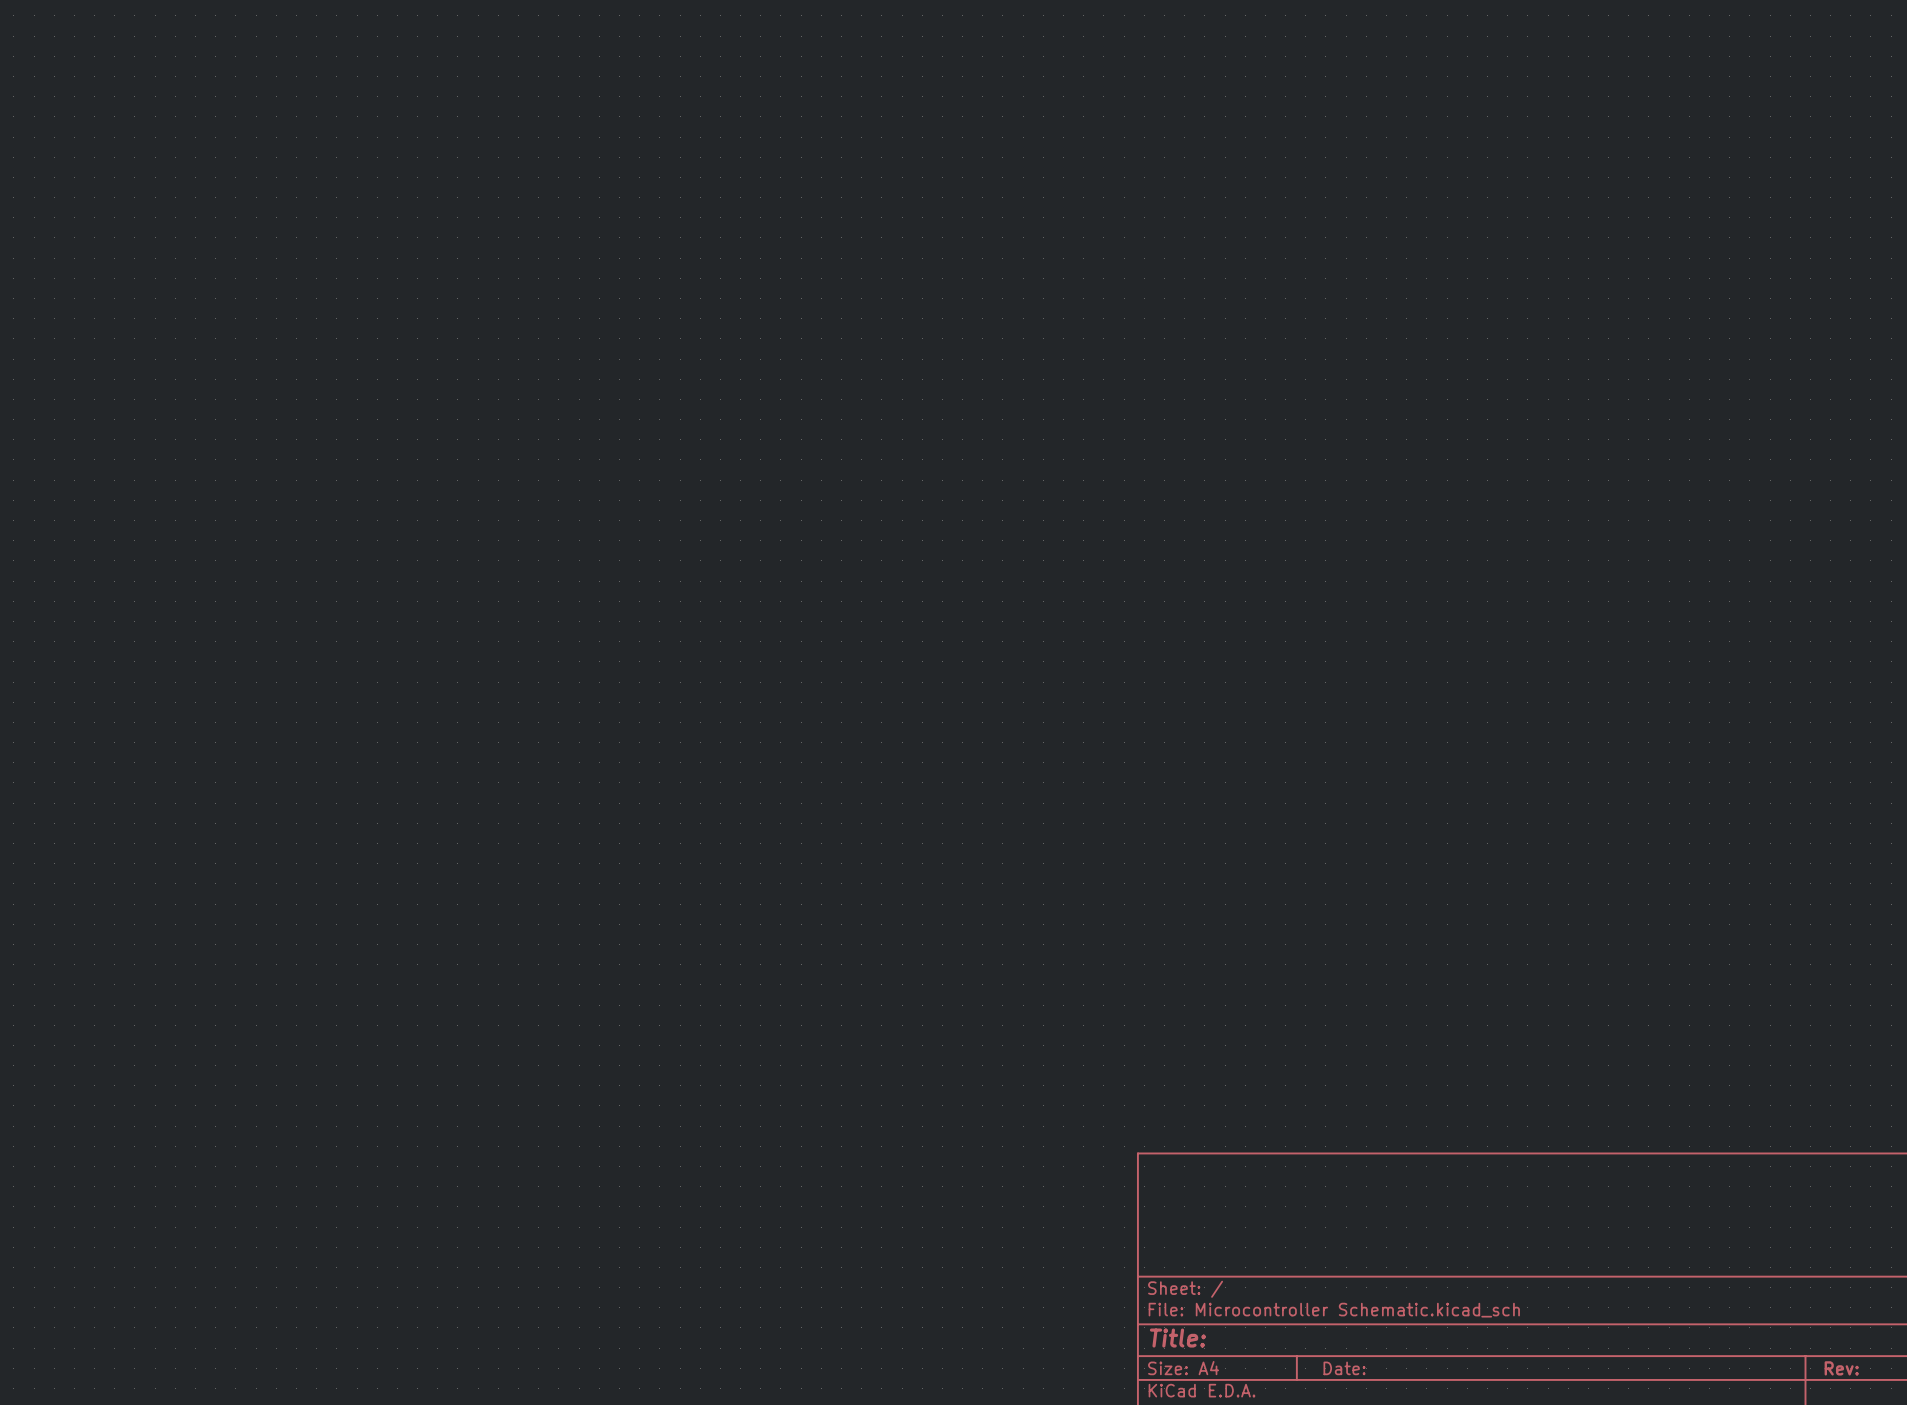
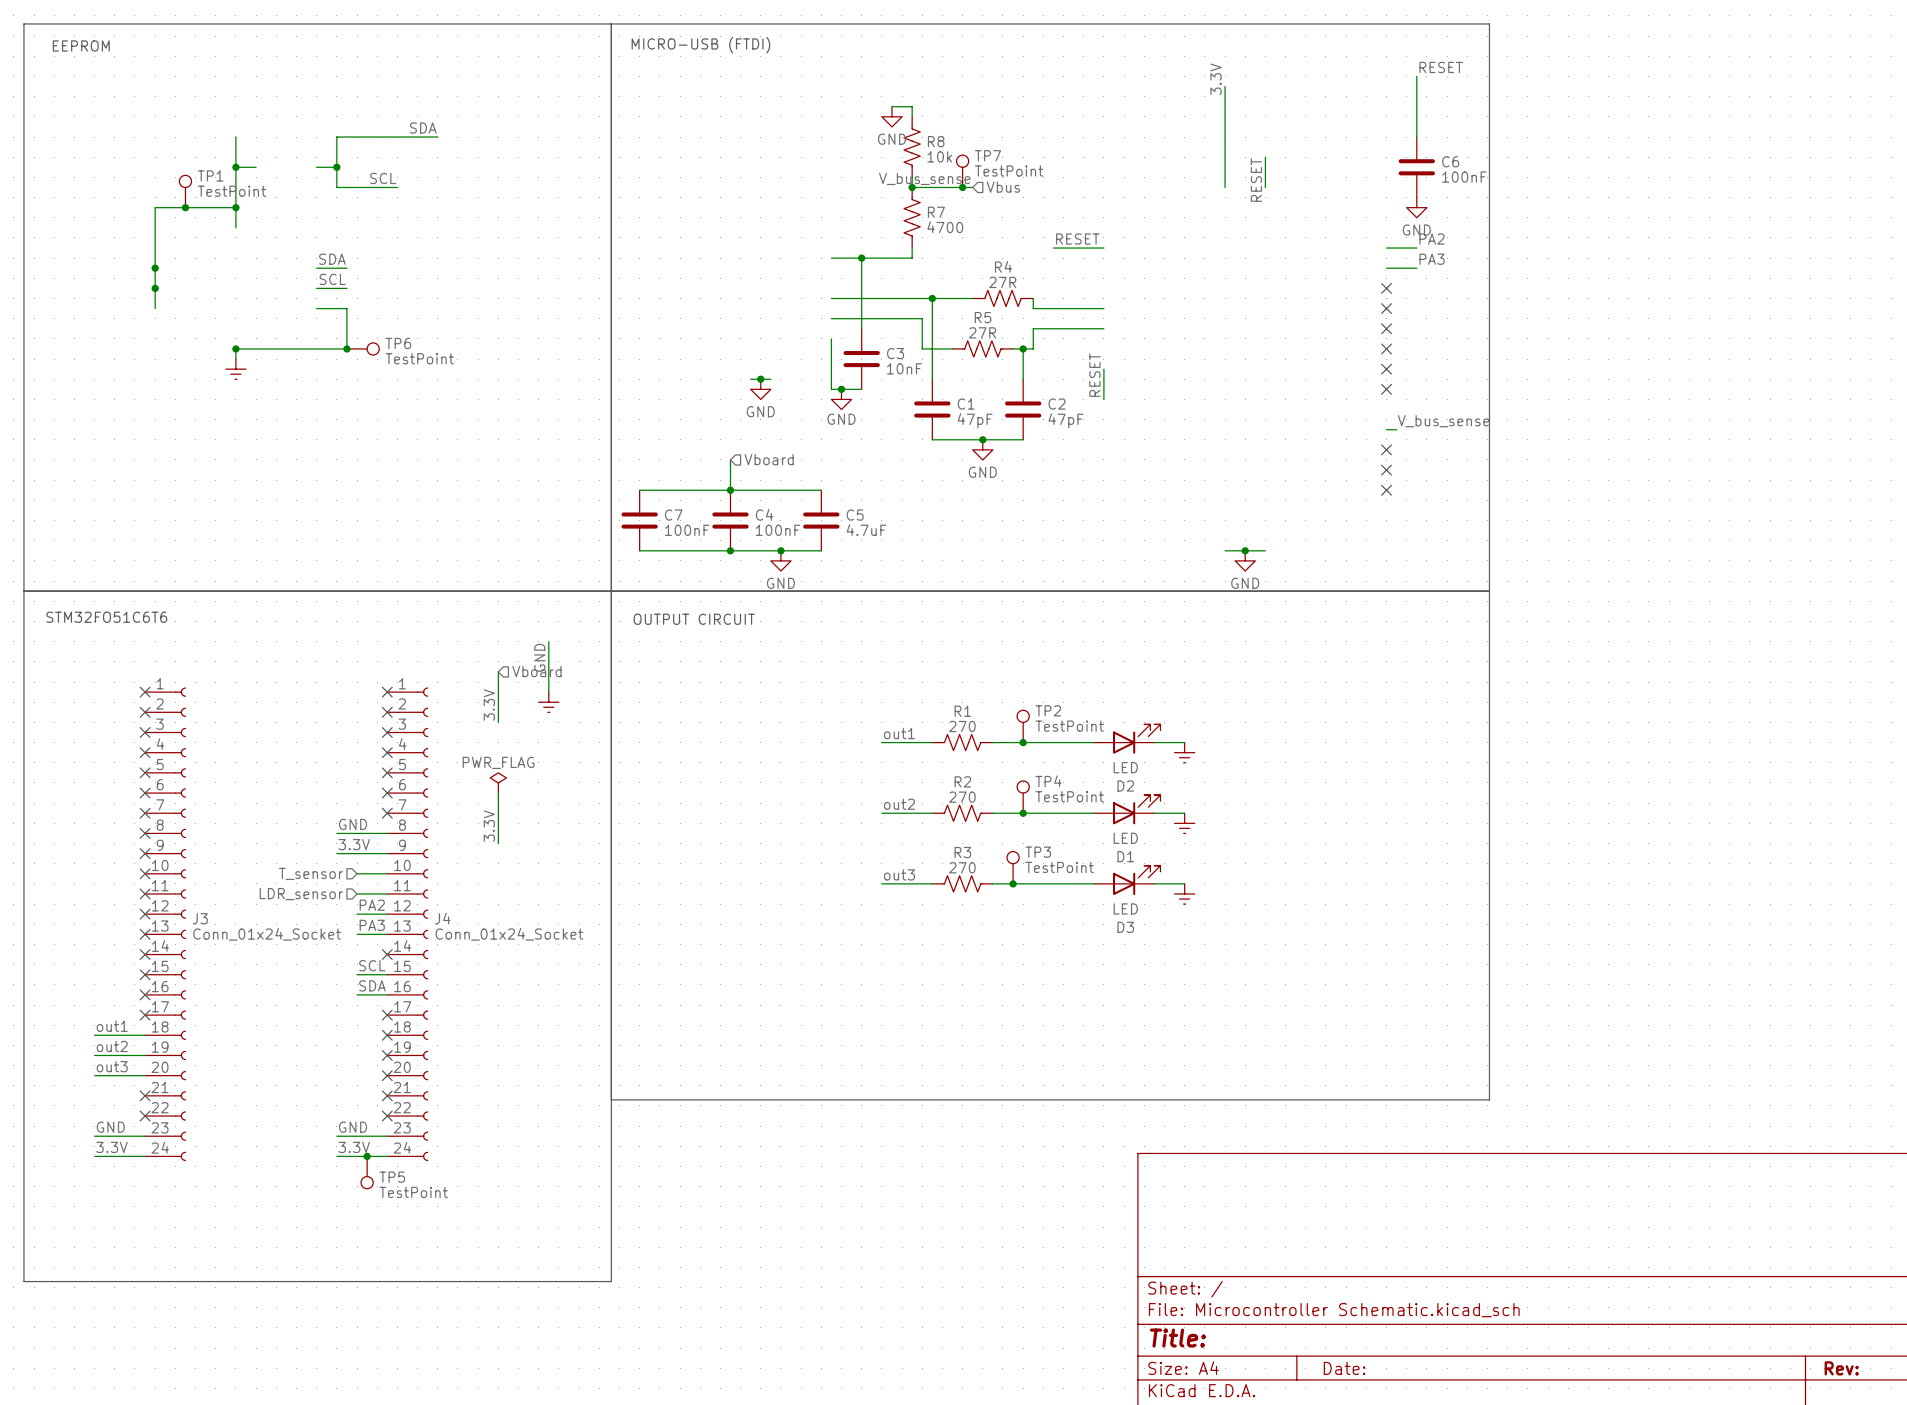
line: none -> (611, 23) (611, 1281) (23, 1281) (23, 23) (1489, 23) (1489, 1099) (611, 1099)
text: none -> EEPROM (81, 45)
text: none -> MICRO-USB (FTDI) (700, 45)
label: none -> RESET (1441, 67)
wire: none -> (1416, 76) (1416, 137)
label: none -> 3.3V (1216, 79)
wire: none -> (1225, 86) (1225, 187)
wire: none -> (891, 106) (912, 106) (912, 116)
power symbol: none -> GND (891, 116)
label: none -> SDA (423, 128)
wire: none -> (235, 137) (235, 227)
wire: none -> (437, 137) (336, 137) (336, 187) (397, 187)
R8: none -> 10k (912, 147)
wire: none -> (1265, 157) (1265, 187)
wire: none -> (235, 167) (256, 167)
junction: none -> (235, 167)
wire: none -> (316, 167) (336, 167)
junction: none -> (336, 167)
C6: none -> 100nF (1416, 167)
TP7: none -> TestPoint (962, 171)
wire: none -> (912, 177) (912, 187) (972, 187)
label: none -> SCL (383, 178)
label: none -> V_bus_sense (924, 178)
label: none -> RESET (1256, 180)
junction: none -> (912, 187)
junction: none -> (962, 187)
hierarchical label: none -> Vbus (1003, 187)
TP1: none -> TestPoint (185, 191)
junction: none -> (185, 207)
wire: none -> (235, 207) (155, 207) (155, 308)
junction: none -> (235, 207)
power symbol: none -> GND (1416, 207)
R7: none -> 4700 (912, 217)
label: none -> RESET (1077, 239)
label: none -> PA2 (1432, 239)
wire: none -> (912, 248) (912, 258) (831, 258)
wire: none -> (1053, 248) (1103, 248)
wire: none -> (1386, 248) (1416, 248)
wire: none -> (861, 258) (861, 328)
junction: none -> (861, 258)
label: none -> SDA (332, 259)
label: none -> PA3 (1432, 259)
junction: none -> (155, 268)
wire: none -> (316, 268) (346, 268)
wire: none -> (1386, 268) (1416, 268)
label: none -> SCL (332, 279)
junction: none -> (155, 288)
wire: none -> (316, 288) (346, 288)
no-connect mark: none -> (1386, 288)
wire: none -> (831, 298) (972, 298)
wire: none -> (932, 298) (932, 379)
junction: none -> (932, 298)
R4: none -> 27R (1002, 298)
wire: none -> (1033, 298) (1033, 308) (1103, 308)
wire: none -> (316, 308) (346, 308) (346, 348) (235, 348) (235, 359)
no-connect mark: none -> (1386, 308)
wire: none -> (831, 318) (922, 318) (922, 348) (952, 348)
wire: none -> (1103, 328) (1033, 328) (1033, 348) (1013, 348)
no-connect mark: none -> (1386, 328)
wire: none -> (831, 338) (831, 389) (861, 389)
junction: none -> (235, 348)
junction: none -> (346, 348)
TP6: none -> TestPoint (363, 348)
R5: none -> 27R (982, 348)
wire: none -> (1023, 348) (1023, 379)
junction: none -> (1023, 348)
no-connect mark: none -> (1386, 348)
C3: none -> 10nF (861, 359)
power symbol: none -> (235, 369)
wire: none -> (1103, 369) (1103, 399)
no-connect mark: none -> (1386, 369)
label: none -> RESET (1094, 375)
wire: none -> (750, 379) (770, 379)
junction: none -> (760, 379)
power symbol: none -> GND (760, 389)
junction: none -> (841, 389)
no-connect mark: none -> (1386, 389)
power symbol: none -> GND (841, 399)
C1: none -> 47pF (932, 409)
C2: none -> 47pF (1023, 409)
label: none -> V_bus_sense (1443, 421)
wire: none -> (1386, 429) (1396, 429)
wire: none -> (932, 439) (1023, 439)
junction: none -> (982, 439)
power symbol: none -> GND (982, 449)
no-connect mark: none -> (1386, 449)
wire: none -> (730, 459) (730, 490)
hierarchical label: none -> Vboard (769, 459)
no-connect mark: none -> (1386, 470)
wire: none -> (639, 490) (821, 490)
junction: none -> (730, 490)
no-connect mark: none -> (1386, 490)
C7: none -> 100nF (639, 520)
C4: none -> 100nF (730, 520)
C5: none -> 4.7uF (821, 520)
wire: none -> (639, 550) (821, 550)
junction: none -> (730, 550)
junction: none -> (780, 550)
wire: none -> (1225, 550) (1265, 550)
junction: none -> (1245, 550)
power symbol: none -> GND (780, 560)
power symbol: none -> GND (1245, 560)
line: none -> (23, 591) (1489, 591)
text: none -> STM32FO51C6T6 (106, 617)
text: none -> OUTPUT CIRCUIT (694, 619)
wire: none -> (548, 641) (548, 692)
label: none -> GND (539, 657)
wire: none -> (498, 671) (498, 722)
hierarchical label: none -> Vboard (536, 671)
no-connect mark: none -> (145, 692)
no-connect mark: none -> (387, 692)
power symbol: none -> (548, 702)
label: none -> 3.3V (489, 705)
no-connect mark: none -> (145, 712)
no-connect mark: none -> (387, 712)
TP2: none -> TestPoint (1023, 726)
no-connect mark: none -> (145, 732)
no-connect mark: none -> (387, 732)
label: none -> out1 (899, 733)
D2: none -> LED (1127, 739)
wire: none -> (881, 742) (932, 742)
R1: none -> 270 (962, 742)
wire: none -> (992, 742) (1093, 742)
junction: none -> (1023, 742)
wire: none -> (1154, 742) (1184, 742)
no-connect mark: none -> (145, 752)
no-connect mark: none -> (387, 752)
power symbol: none -> (1184, 752)
no-connect mark: none -> (145, 772)
no-connect mark: none -> (387, 772)
power symbol: none -> PWR_FLAG (498, 782)
no-connect mark: none -> (145, 793)
no-connect mark: none -> (387, 793)
wire: none -> (498, 793) (498, 843)
TP4: none -> TestPoint (1023, 797)
label: none -> out2 (899, 804)
D1: none -> LED (1127, 809)
no-connect mark: none -> (145, 813)
no-connect mark: none -> (387, 813)
wire: none -> (881, 813) (932, 813)
R2: none -> 270 (962, 813)
wire: none -> (992, 813) (1093, 813)
junction: none -> (1023, 813)
wire: none -> (1154, 813) (1184, 813)
power symbol: none -> (1184, 823)
label: none -> GND (353, 824)
label: none -> 3.3V (489, 826)
no-connect mark: none -> (145, 833)
wire: none -> (336, 833) (387, 833)
label: none -> 3.3V (354, 844)
no-connect mark: none -> (145, 853)
wire: none -> (336, 853) (387, 853)
TP3: none -> TestPoint (1013, 867)
no-connect mark: none -> (145, 873)
hierarchical label: none -> T_sensor (310, 873)
wire: none -> (357, 873) (387, 873)
label: none -> out3 (899, 874)
D3: none -> LED (1127, 880)
wire: none -> (881, 883) (932, 883)
R3: none -> 270 (962, 883)
wire: none -> (992, 883) (1093, 883)
junction: none -> (1013, 883)
wire: none -> (1154, 883) (1184, 883)
no-connect mark: none -> (145, 893)
wire: none -> (357, 893) (387, 893)
power symbol: none -> (1184, 893)
hierarchical label: none -> LDR_sensor (301, 894)
label: none -> PA2 (372, 905)
no-connect mark: none -> (145, 914)
wire: none -> (357, 914) (387, 914)
J3: none -> Conn_01x24_Socket (165, 924)
J4: none -> Conn_01x24_Socket (407, 924)
label: none -> PA3 (372, 925)
no-connect mark: none -> (145, 934)
wire: none -> (357, 934) (387, 934)
no-connect mark: none -> (145, 954)
no-connect mark: none -> (387, 954)
label: none -> SCL (372, 965)
no-connect mark: none -> (145, 974)
wire: none -> (357, 974) (387, 974)
label: none -> SDA (372, 985)
no-connect mark: none -> (145, 994)
wire: none -> (357, 994) (387, 994)
no-connect mark: none -> (145, 1015)
no-connect mark: none -> (387, 1015)
label: none -> out1 (112, 1026)
wire: none -> (94, 1035) (145, 1035)
no-connect mark: none -> (387, 1035)
label: none -> out2 (112, 1046)
wire: none -> (94, 1055) (145, 1055)
no-connect mark: none -> (387, 1055)
label: none -> out3 (112, 1066)
wire: none -> (94, 1075) (145, 1075)
no-connect mark: none -> (387, 1075)
no-connect mark: none -> (145, 1095)
no-connect mark: none -> (387, 1095)
no-connect mark: none -> (145, 1116)
no-connect mark: none -> (387, 1116)
label: none -> GND (110, 1127)
label: none -> GND (353, 1127)
wire: none -> (94, 1136) (145, 1136)
wire: none -> (336, 1136) (387, 1136)
label: none -> 3.3V (111, 1147)
label: none -> 3.3V (354, 1147)
wire: none -> (94, 1156) (145, 1156)
wire: none -> (336, 1156) (387, 1156)
junction: none -> (367, 1156)
TP5: none -> TestPoint (367, 1172)

